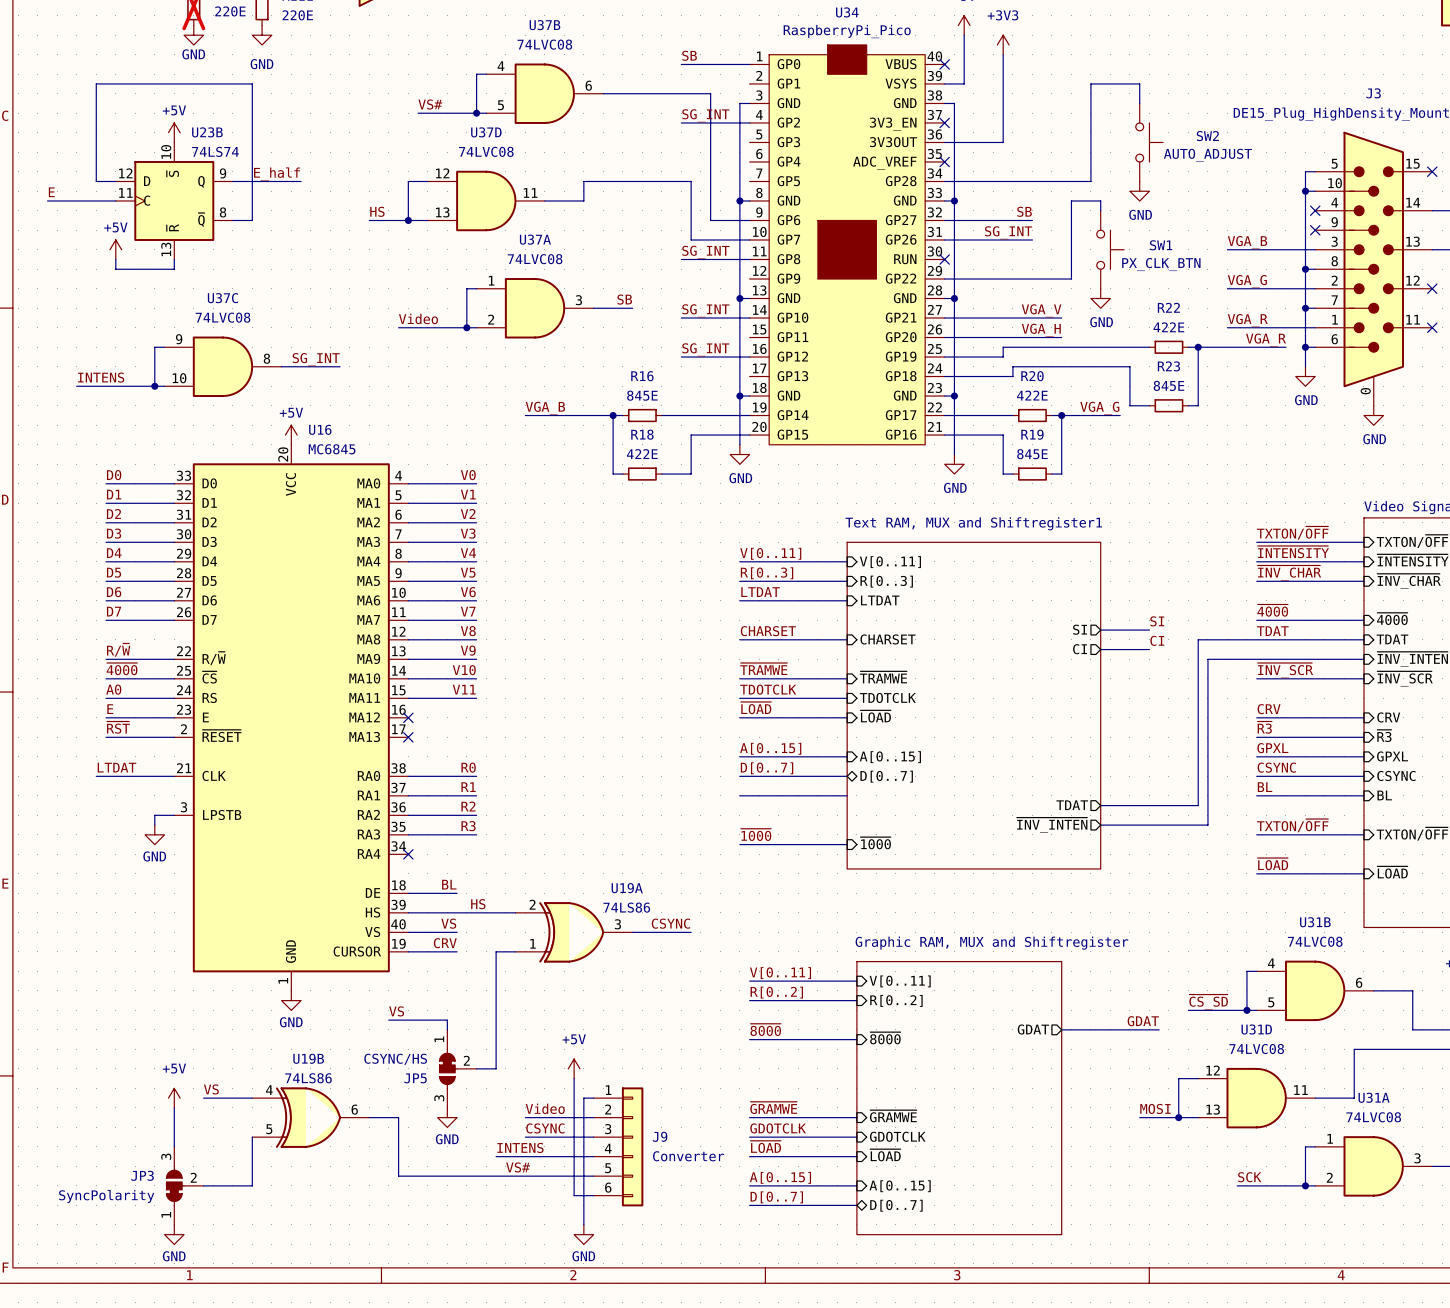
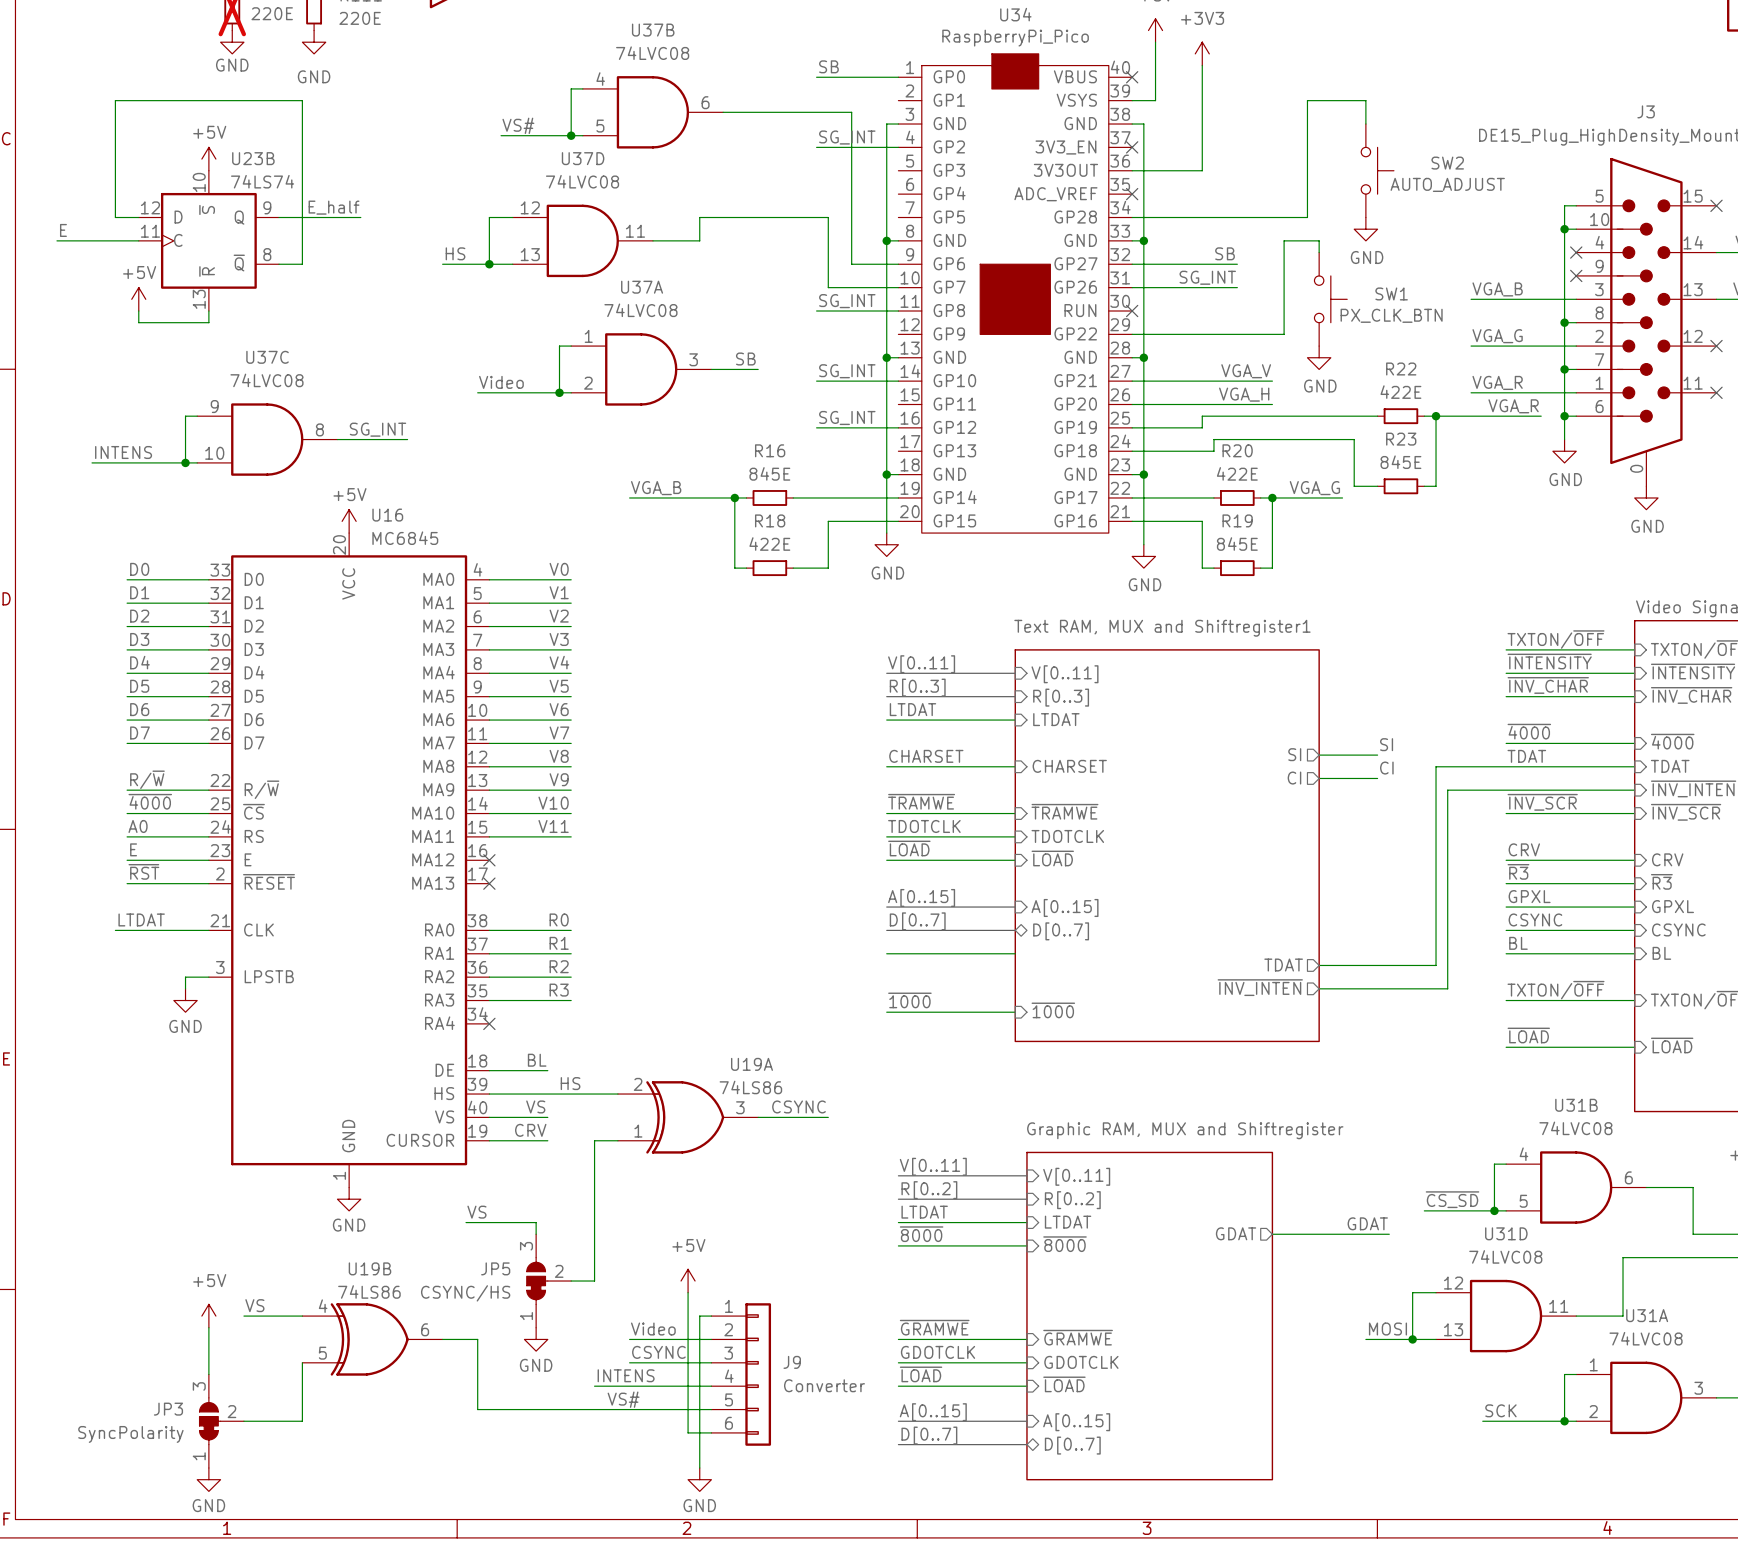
label: none -> LTDAT (924, 1212)
sheet pin: none -> LTDAT (1068, 1222)
wire: none -> (898, 1222) (1026, 1222)
JP5 flip: as is (448, 1068) -> up-down (537, 1281)

